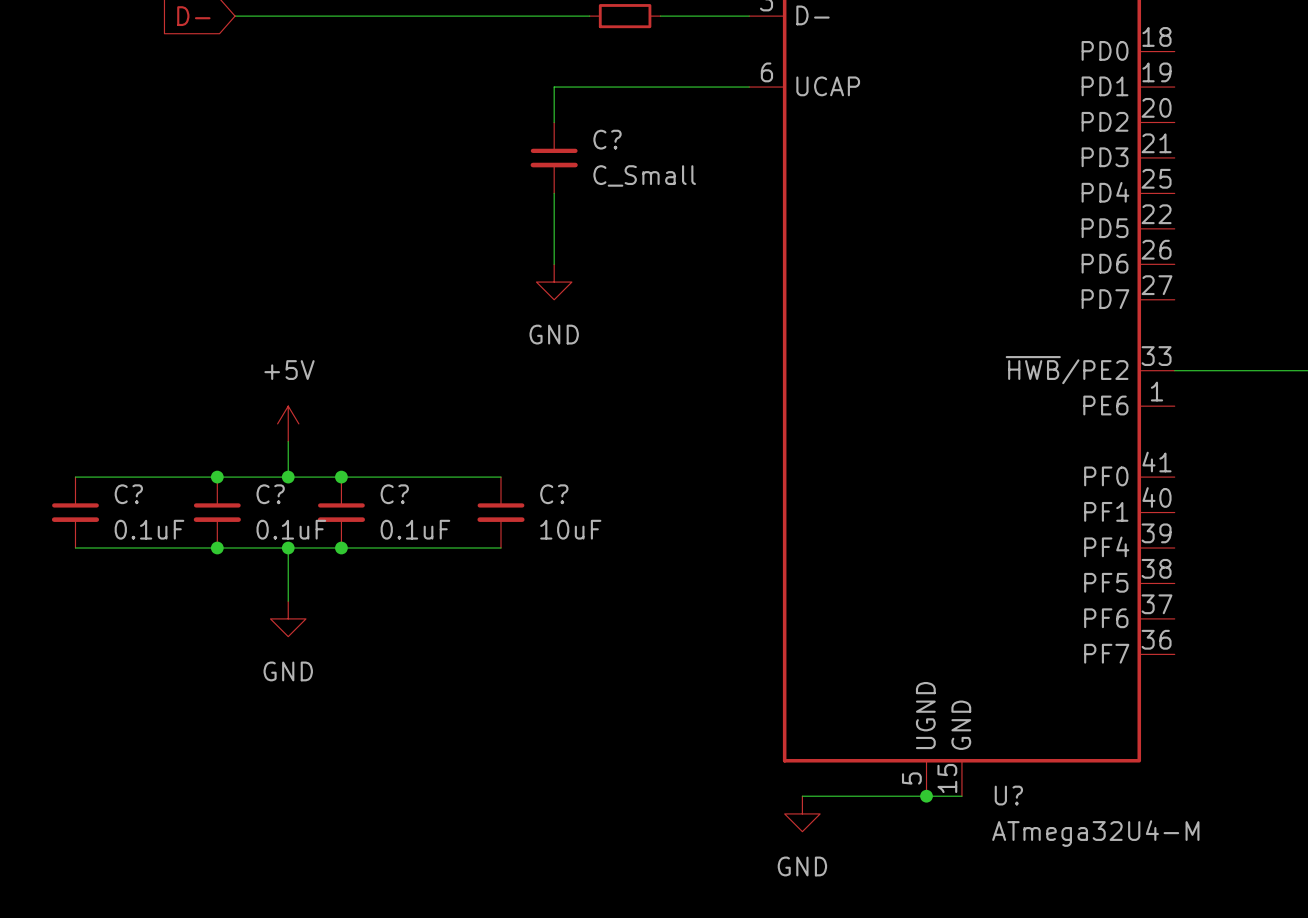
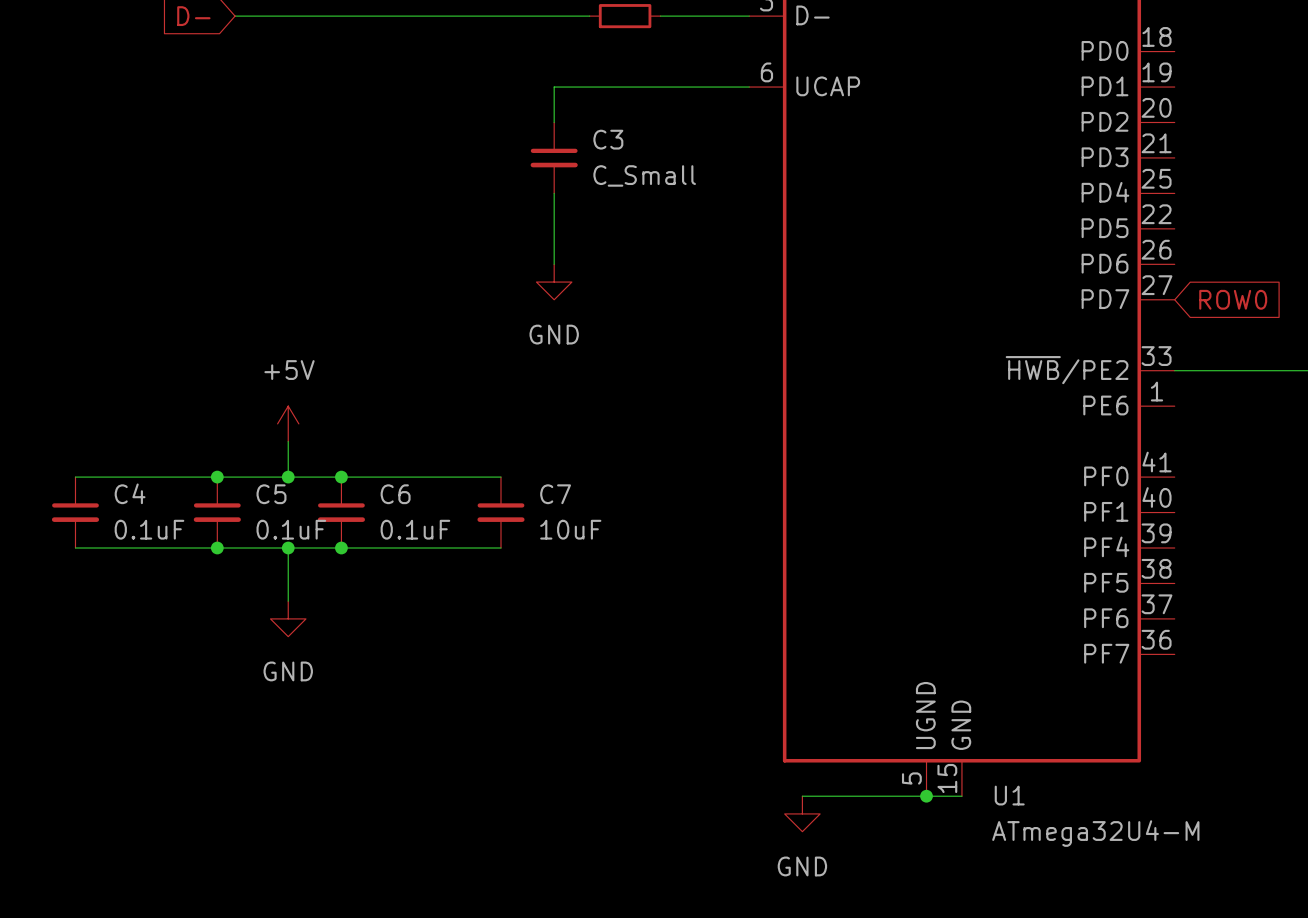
C? name: C? (607, 139) -> C3 (608, 139)
global label: none -> ROW0 (1233, 299)
C? name: C? (128, 494) -> C4 (130, 493)
C? name: C? (270, 494) -> C5 (271, 494)
C? name: C? (394, 494) -> C6 (395, 494)
C? name: C? (554, 494) -> C7 (555, 494)
U? name: U? (1008, 795) -> U1 (1009, 795)

